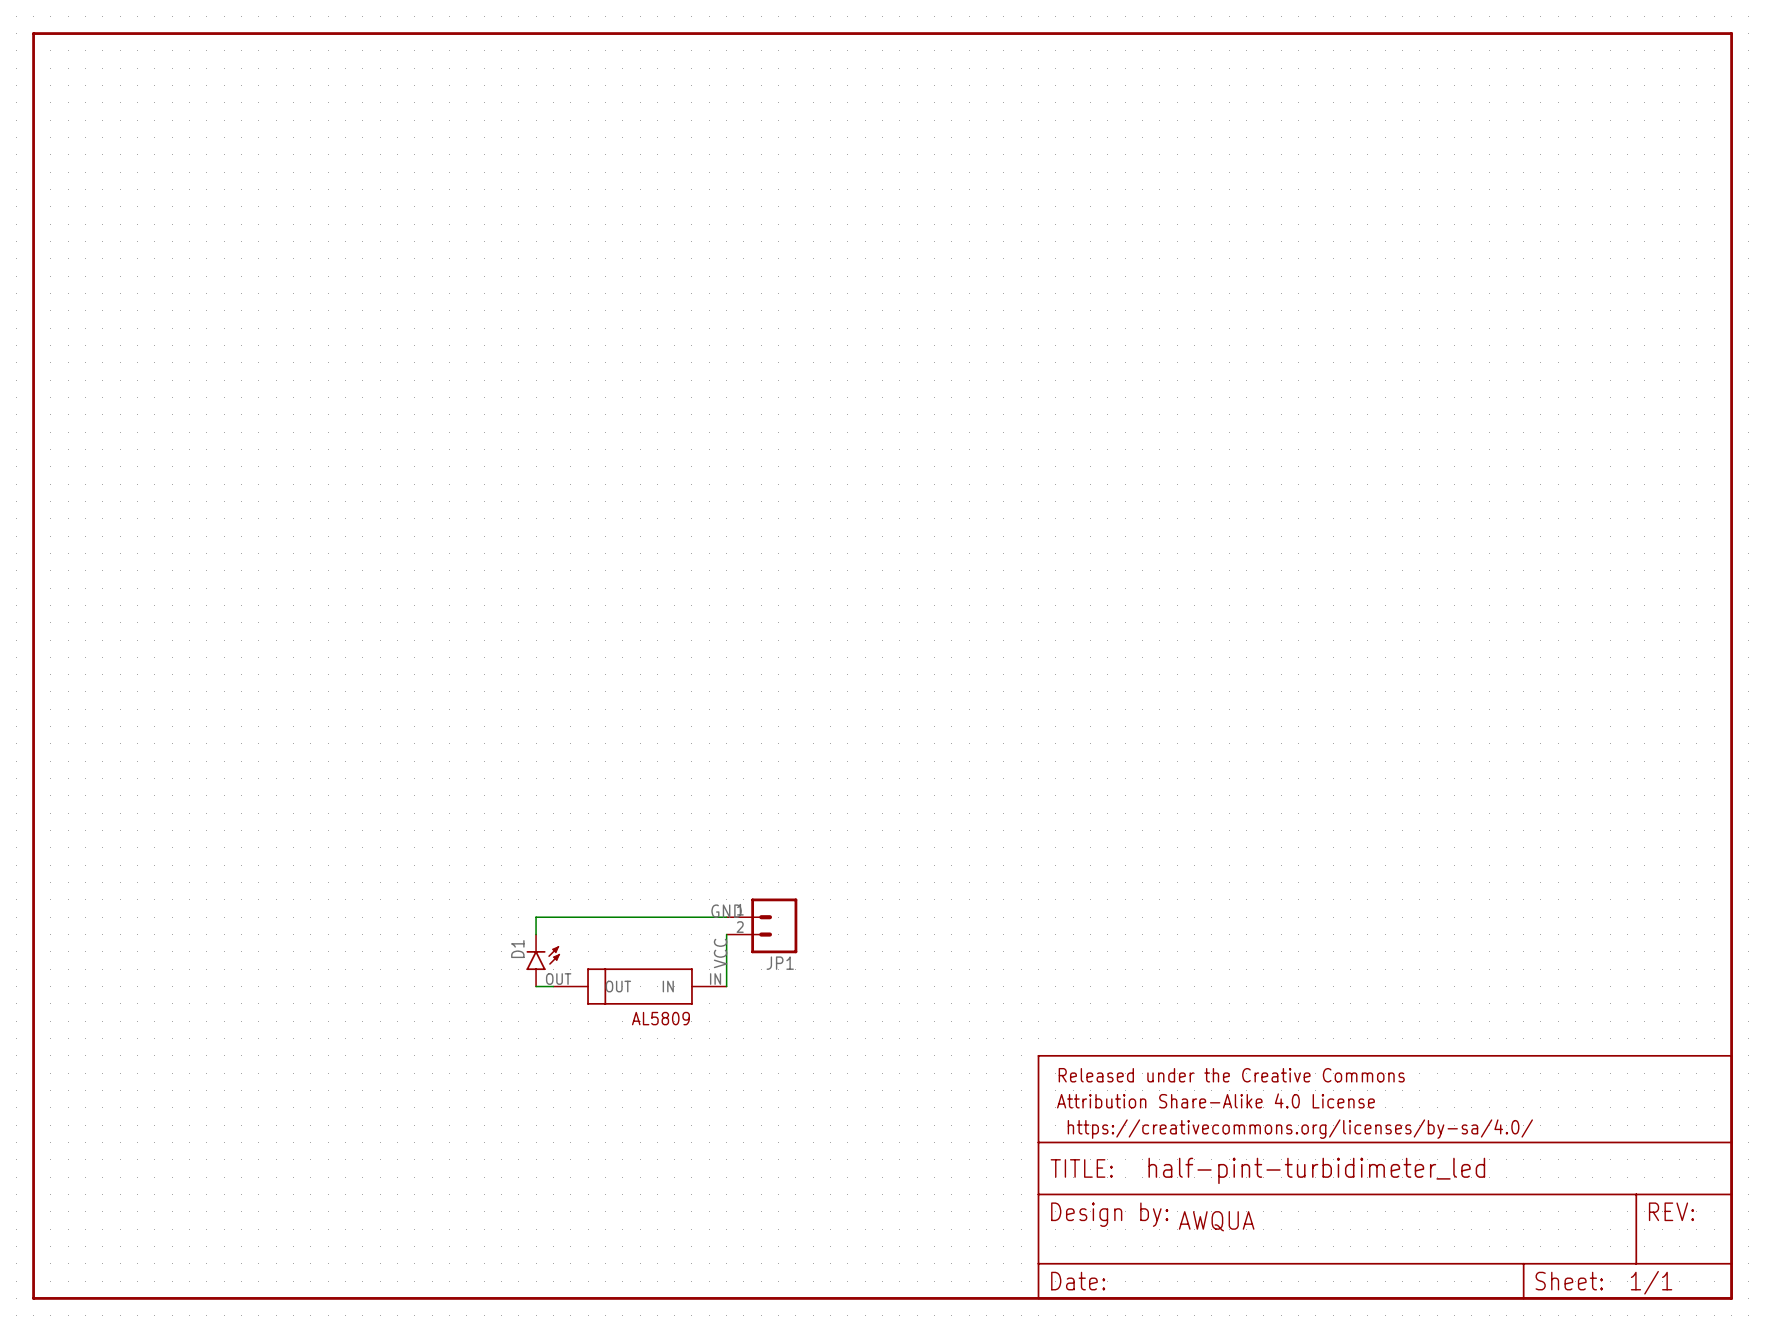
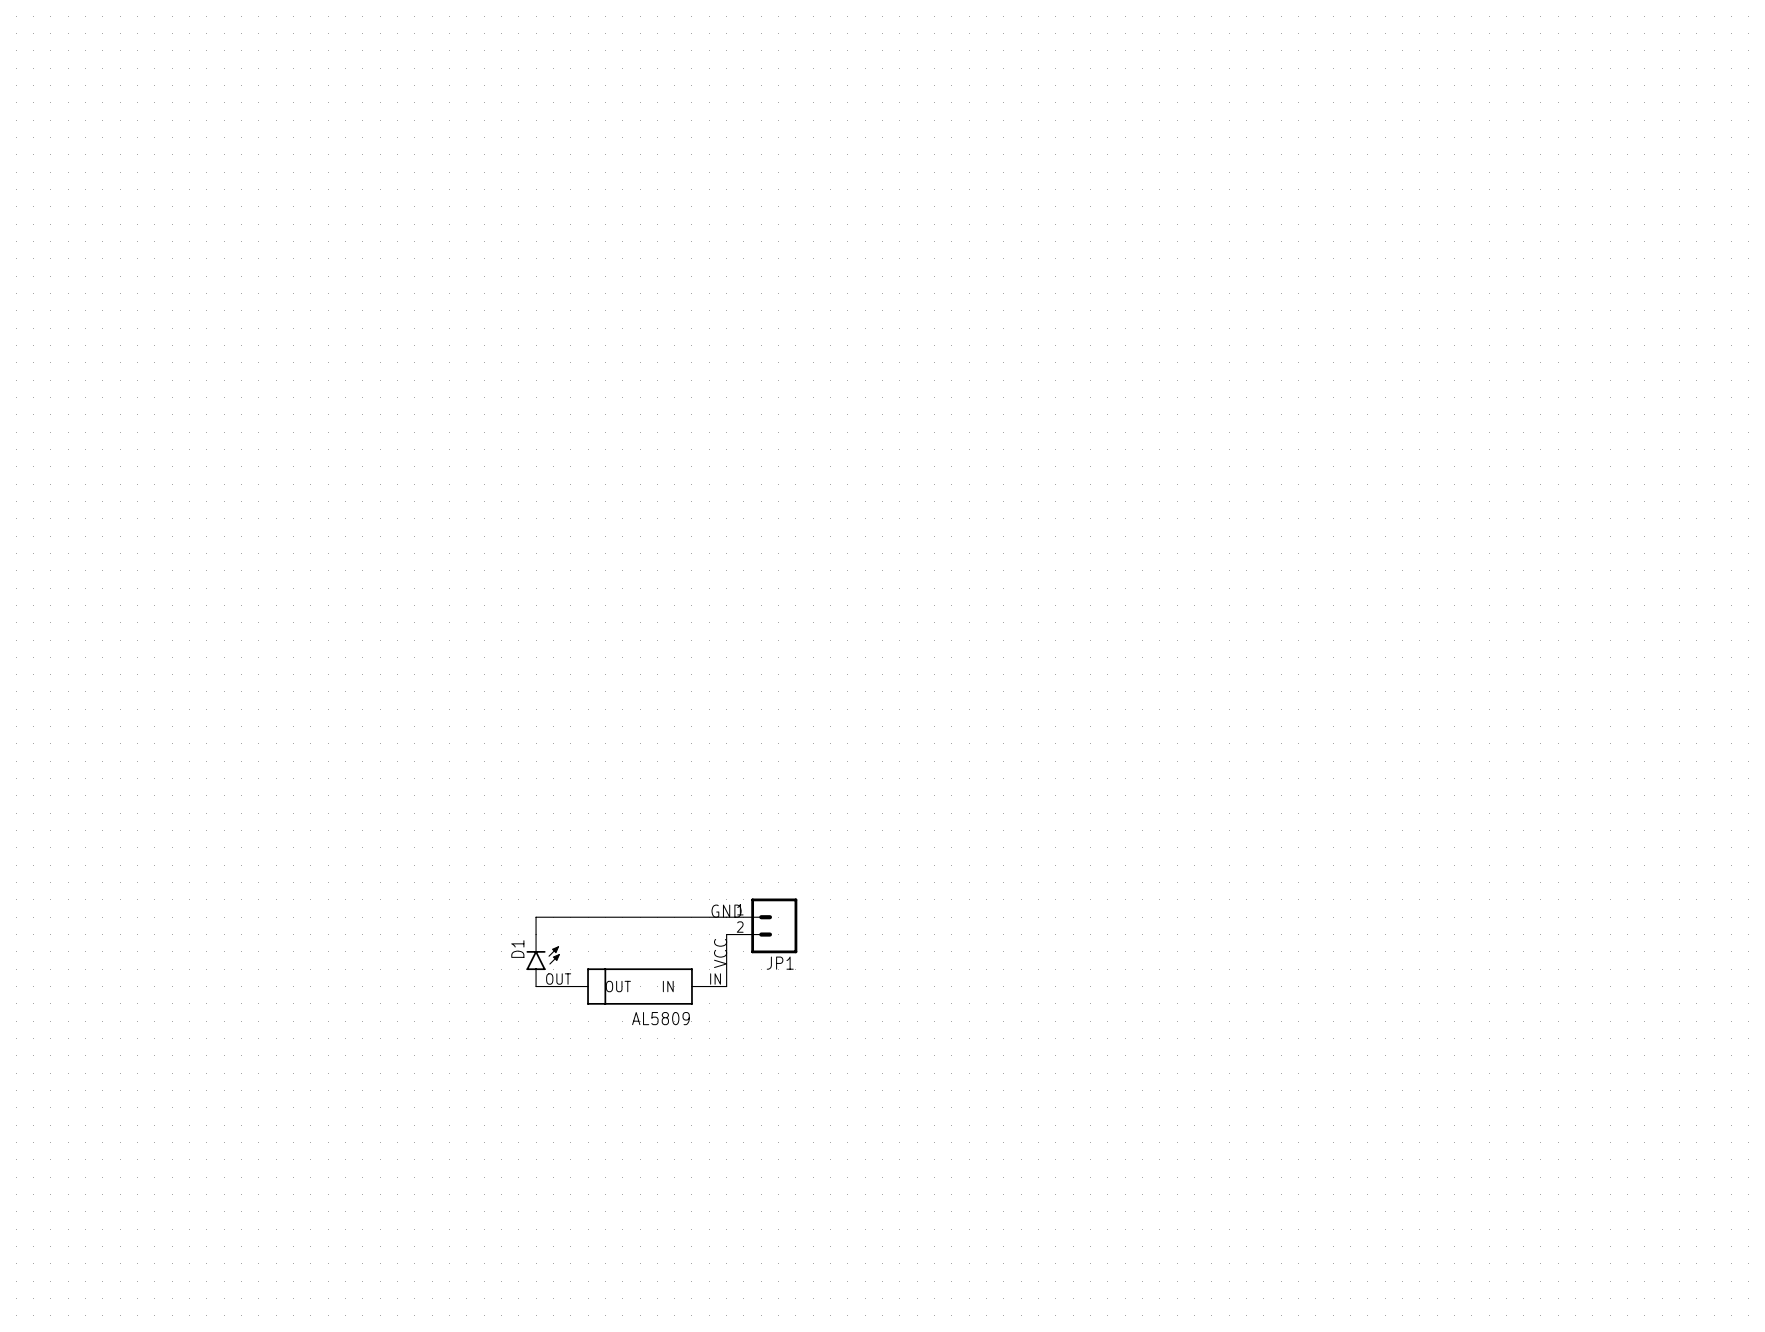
part: (882, 665) -> none
part: (1385, 1177) -> none
text: AWQUA (1216, 1221) -> none

